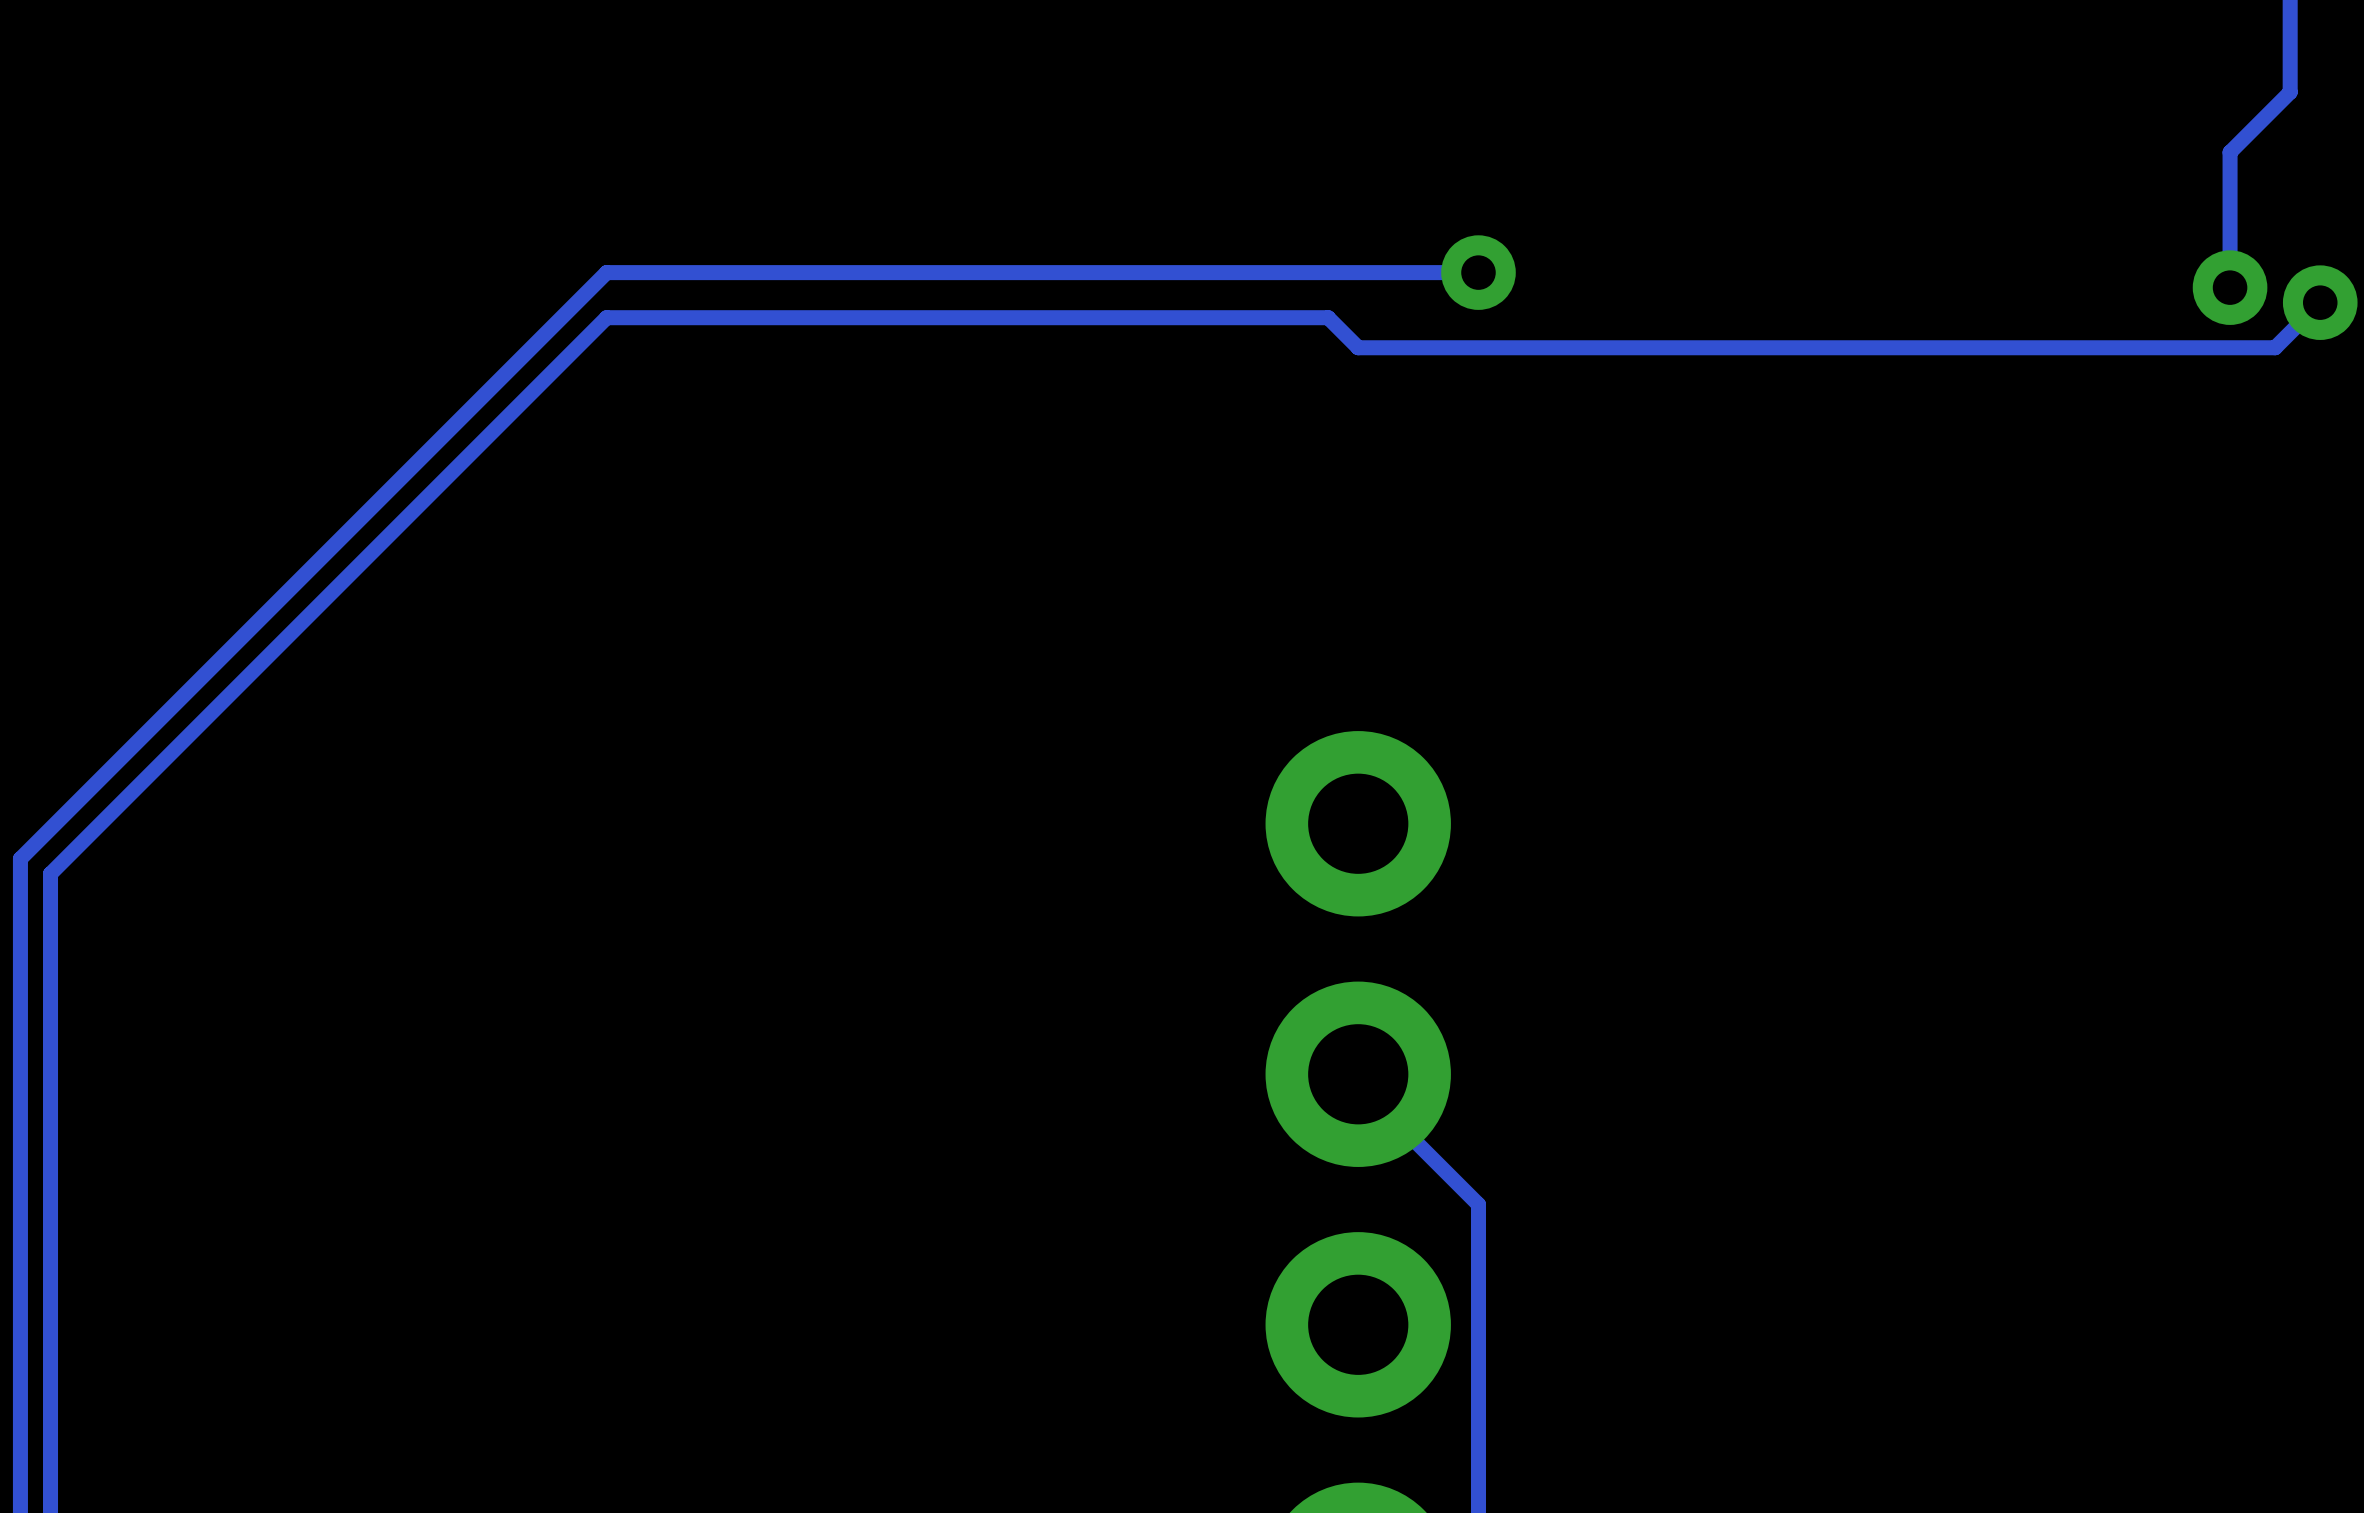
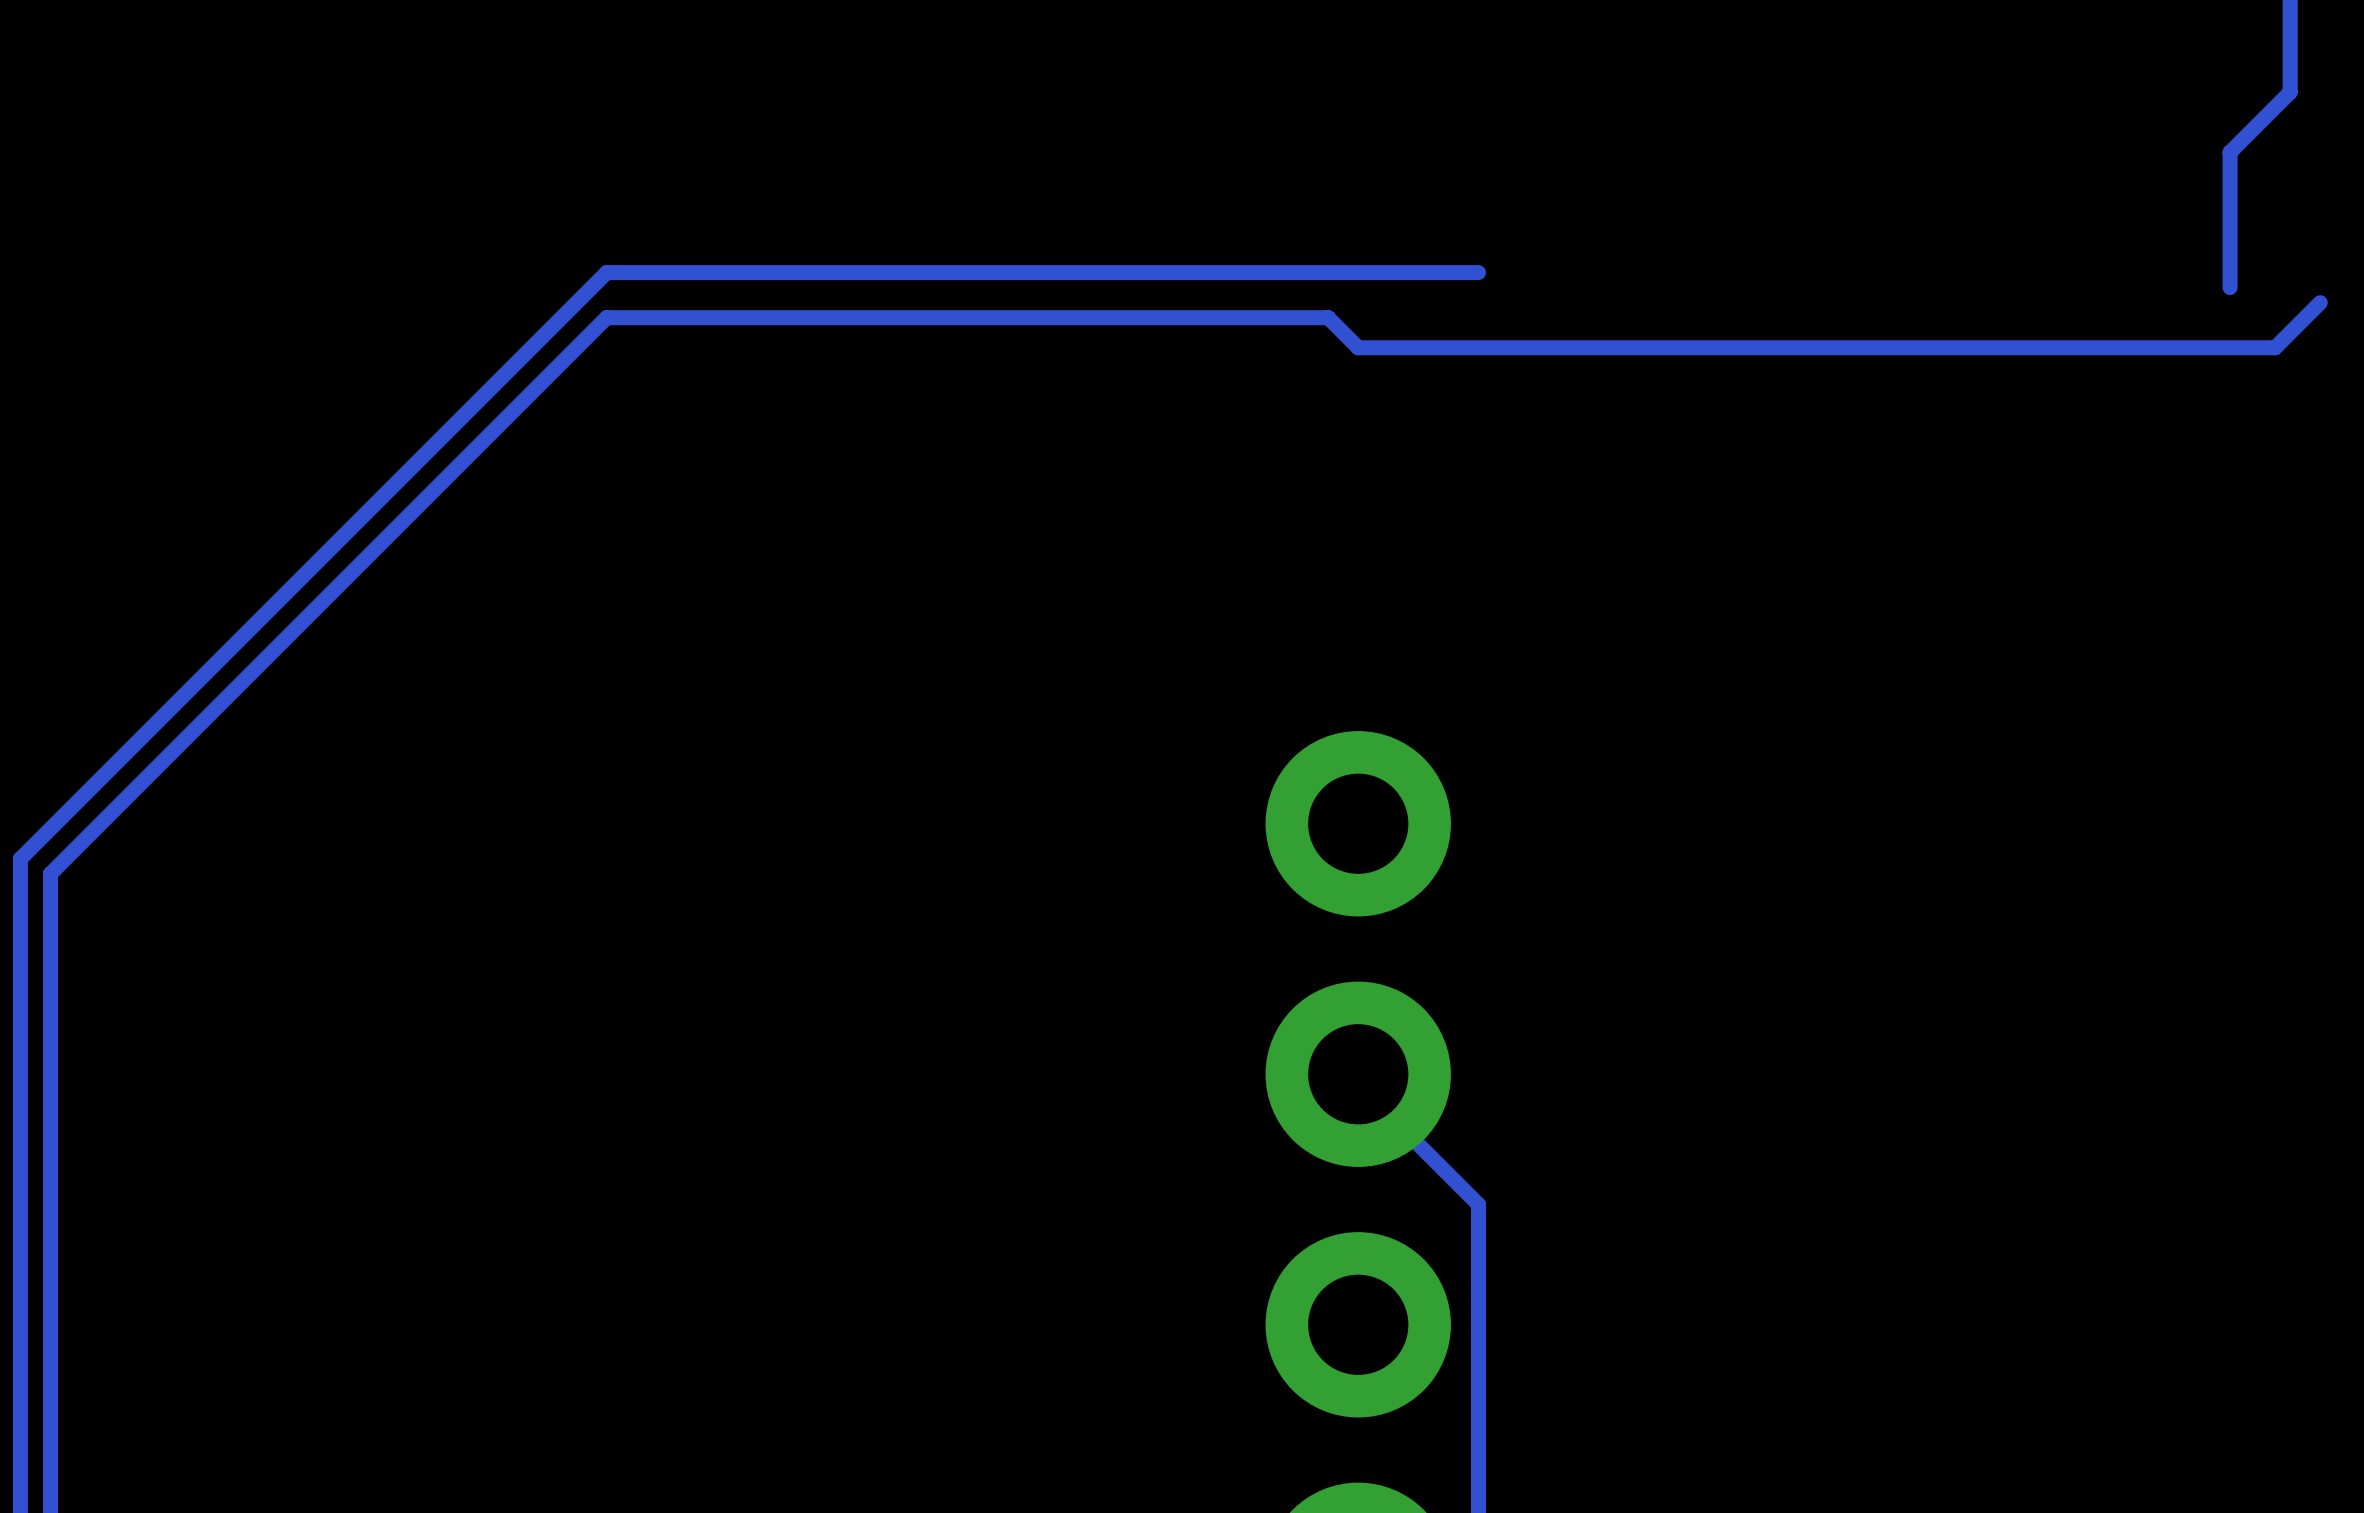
via: (1478, 272) -> none
via: (2230, 287) -> none
via: (2320, 302) -> none

